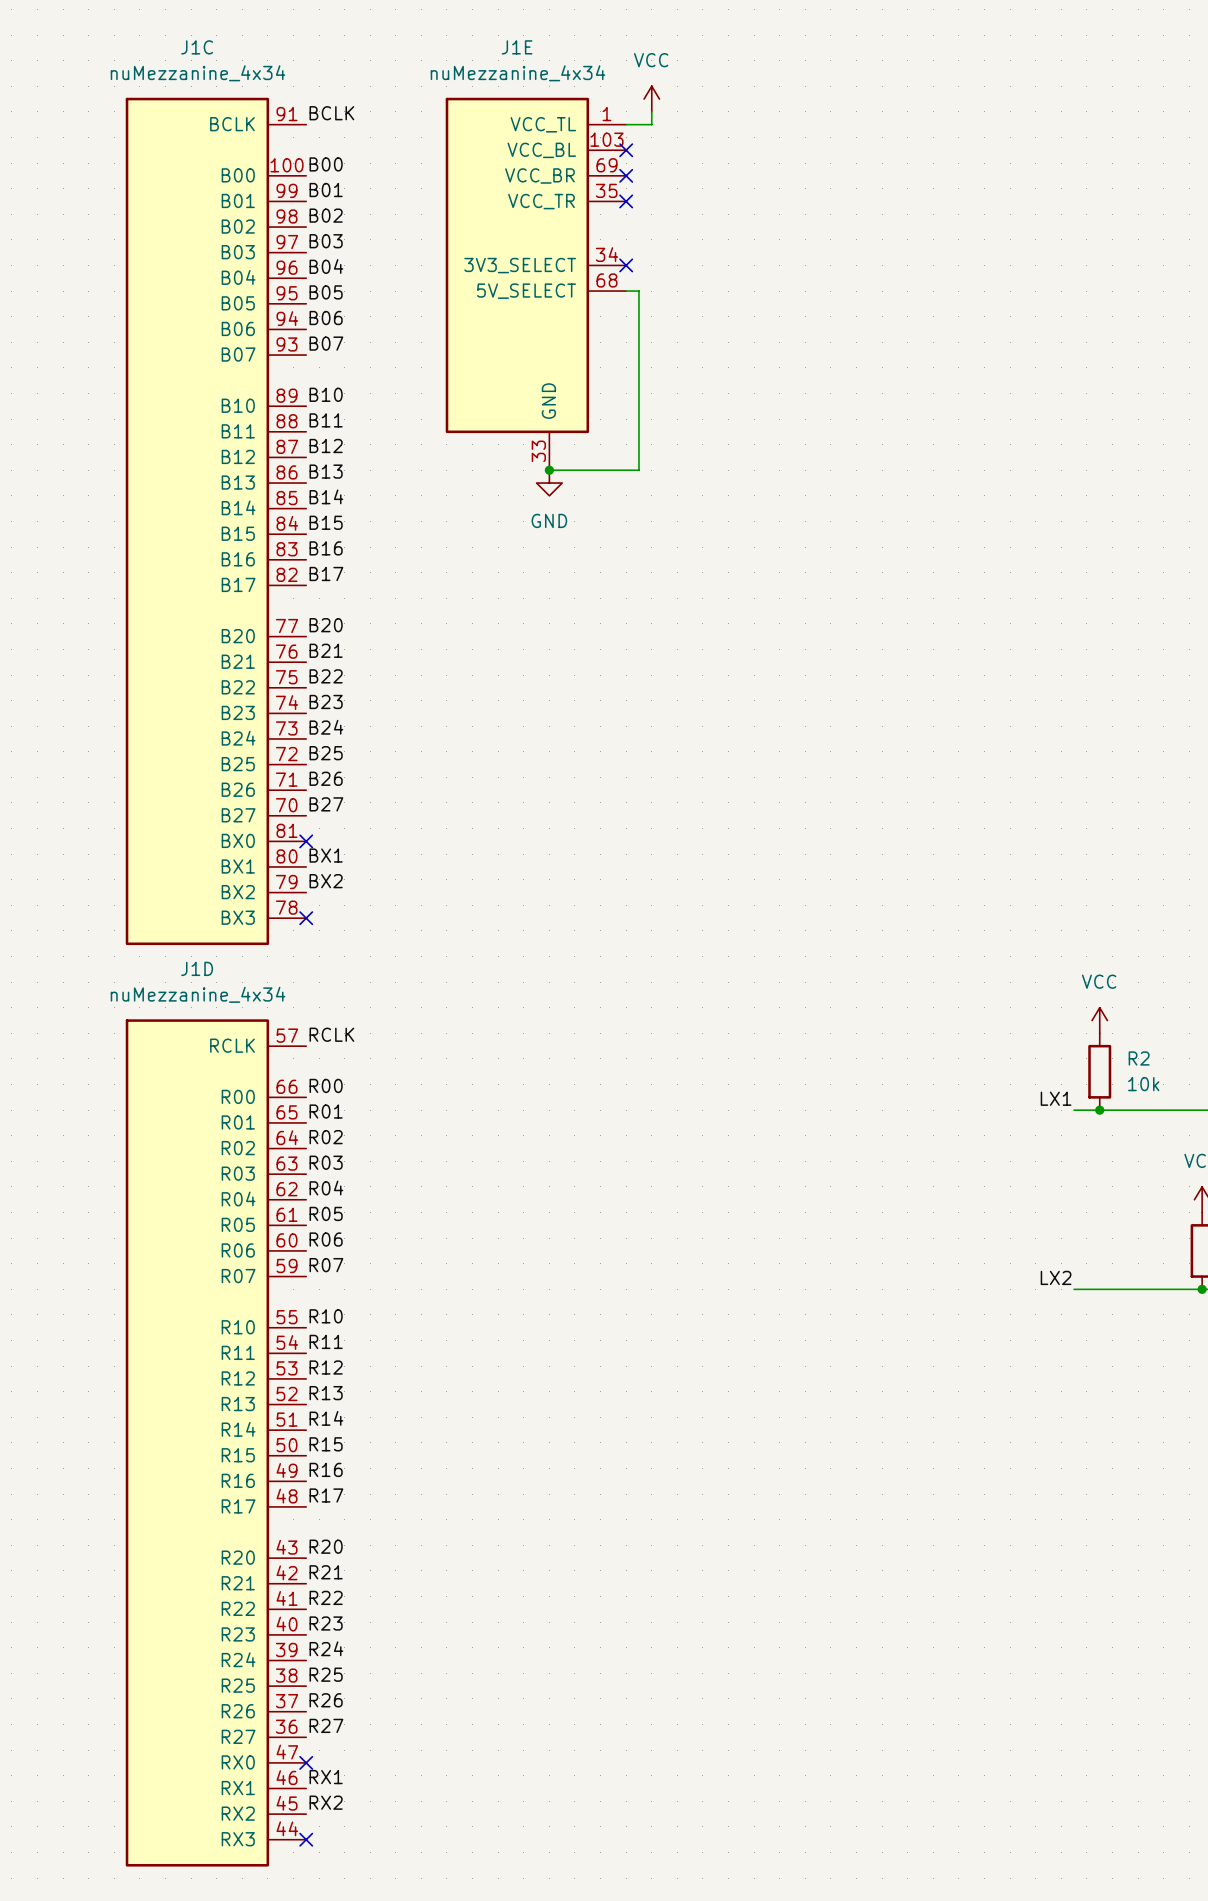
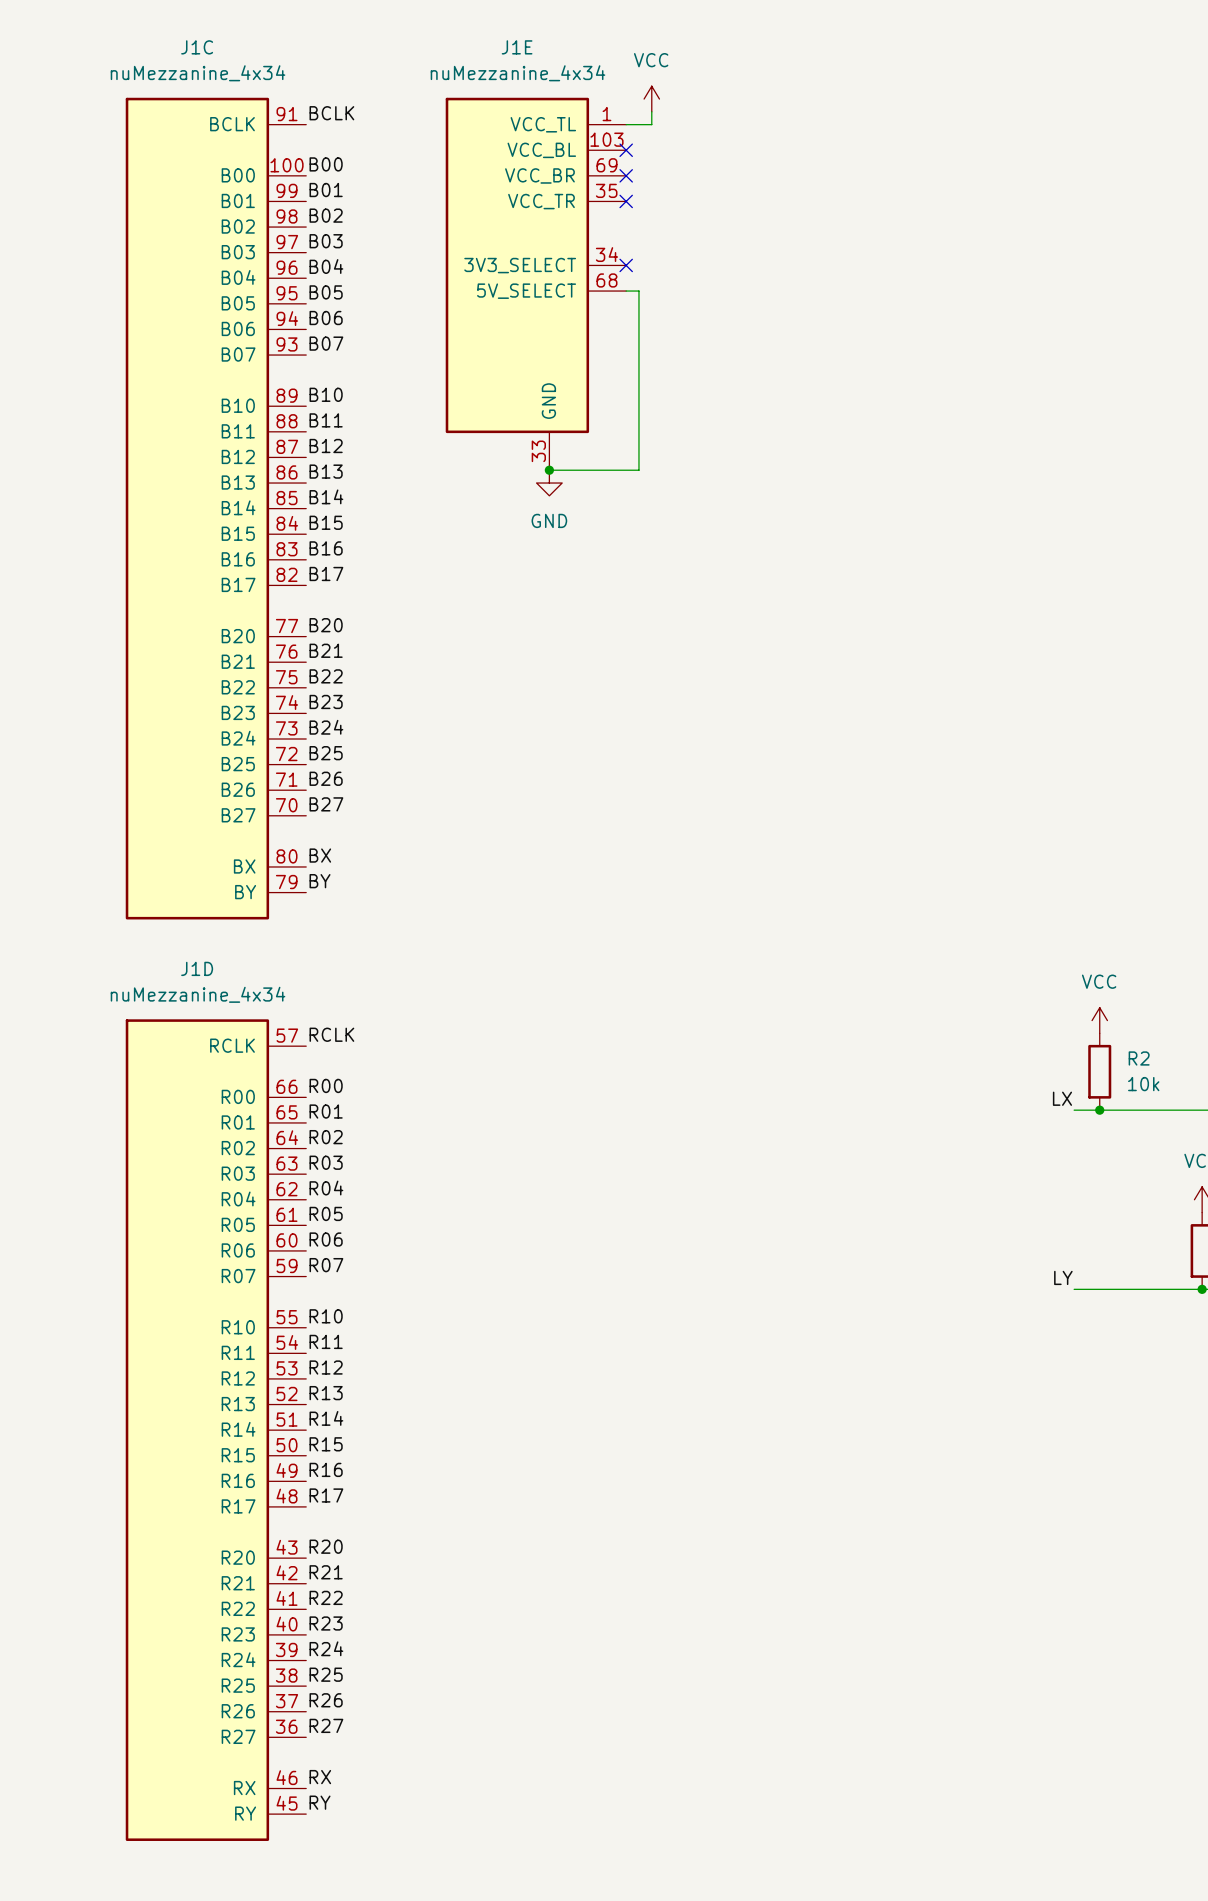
J1C symbol: [125, 97, 307, 946] -> [125, 97, 307, 920]
no-connect mark: (306, 841) -> none
label: BX1 (326, 855) -> BX (320, 855)
label: BX2 (326, 881) -> BY (320, 881)
no-connect mark: (306, 918) -> none
J1D symbol: [125, 1019, 307, 1867] -> [125, 1019, 307, 1841]
label: LX1 (1056, 1098) -> LX (1062, 1098)
label: LX2 (1056, 1277) -> LY (1063, 1277)
no-connect mark: (306, 1762) -> none
label: RX1 (326, 1777) -> RX (320, 1777)
label: RX2 (326, 1802) -> RY (320, 1802)
no-connect mark: (306, 1839) -> none

